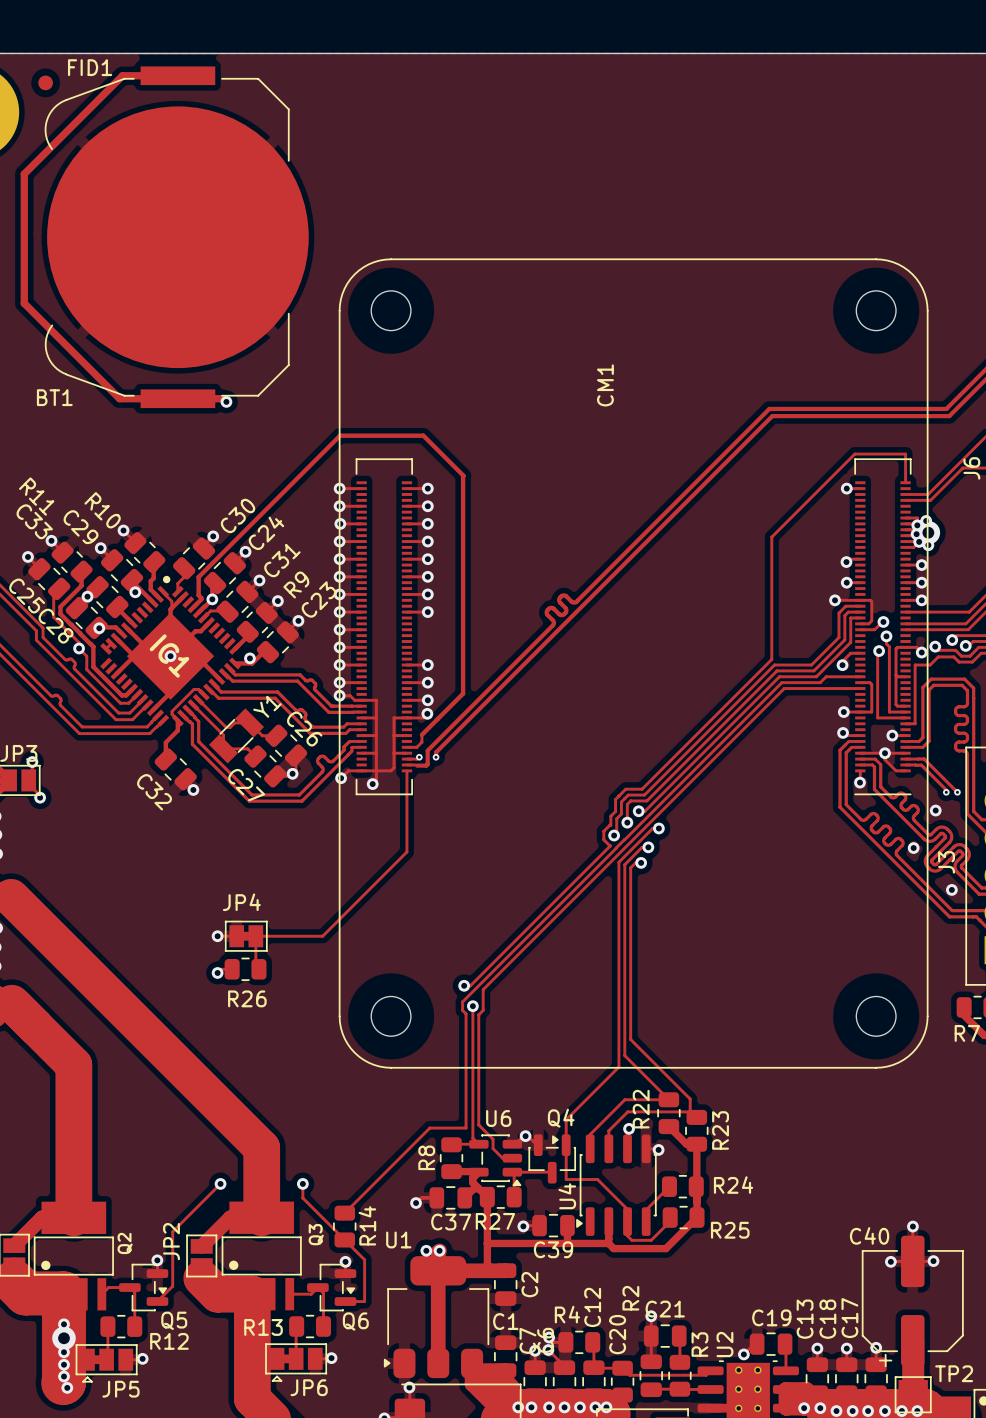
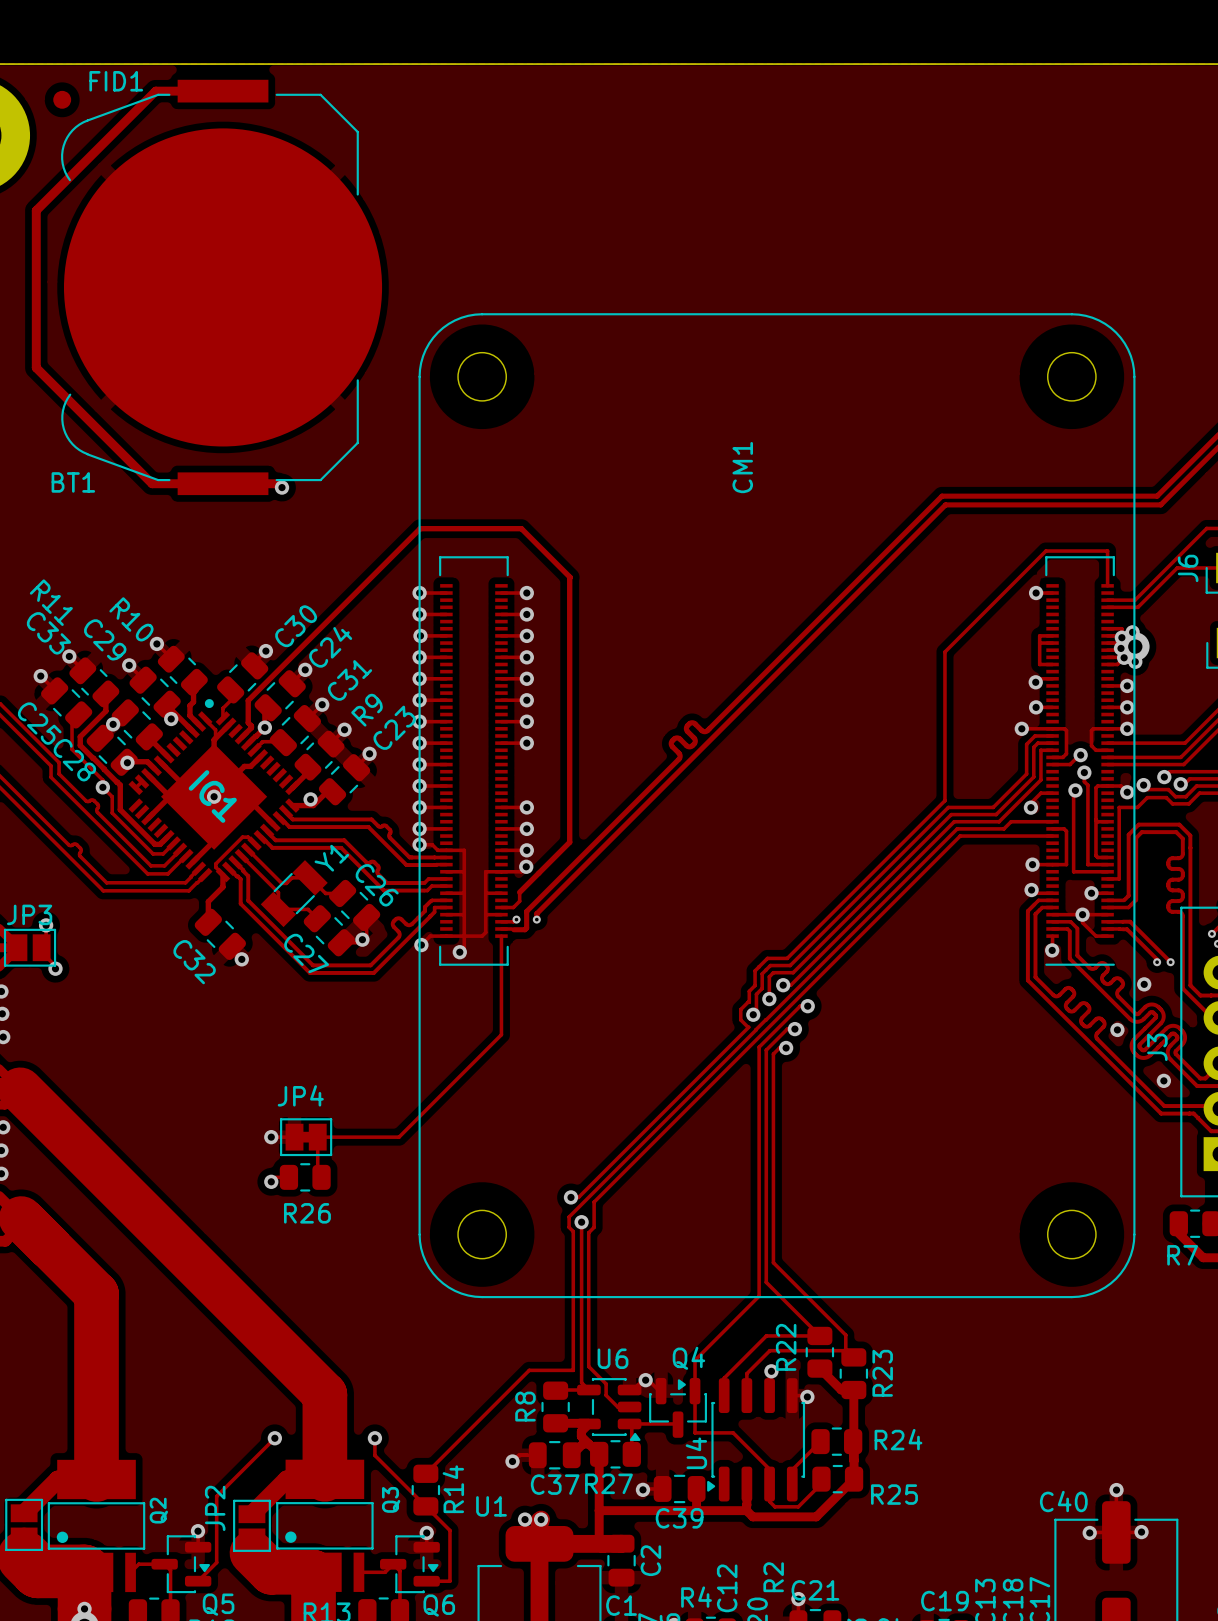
track: none -> (1052, 635) (1039, 635) (1039, 664) (1052, 664)
track: none -> (1039, 643) (1052, 643)
track: none -> (1107, 728) (1093, 728) (1091, 730) (1091, 745) (1095, 750) (1107, 750)

